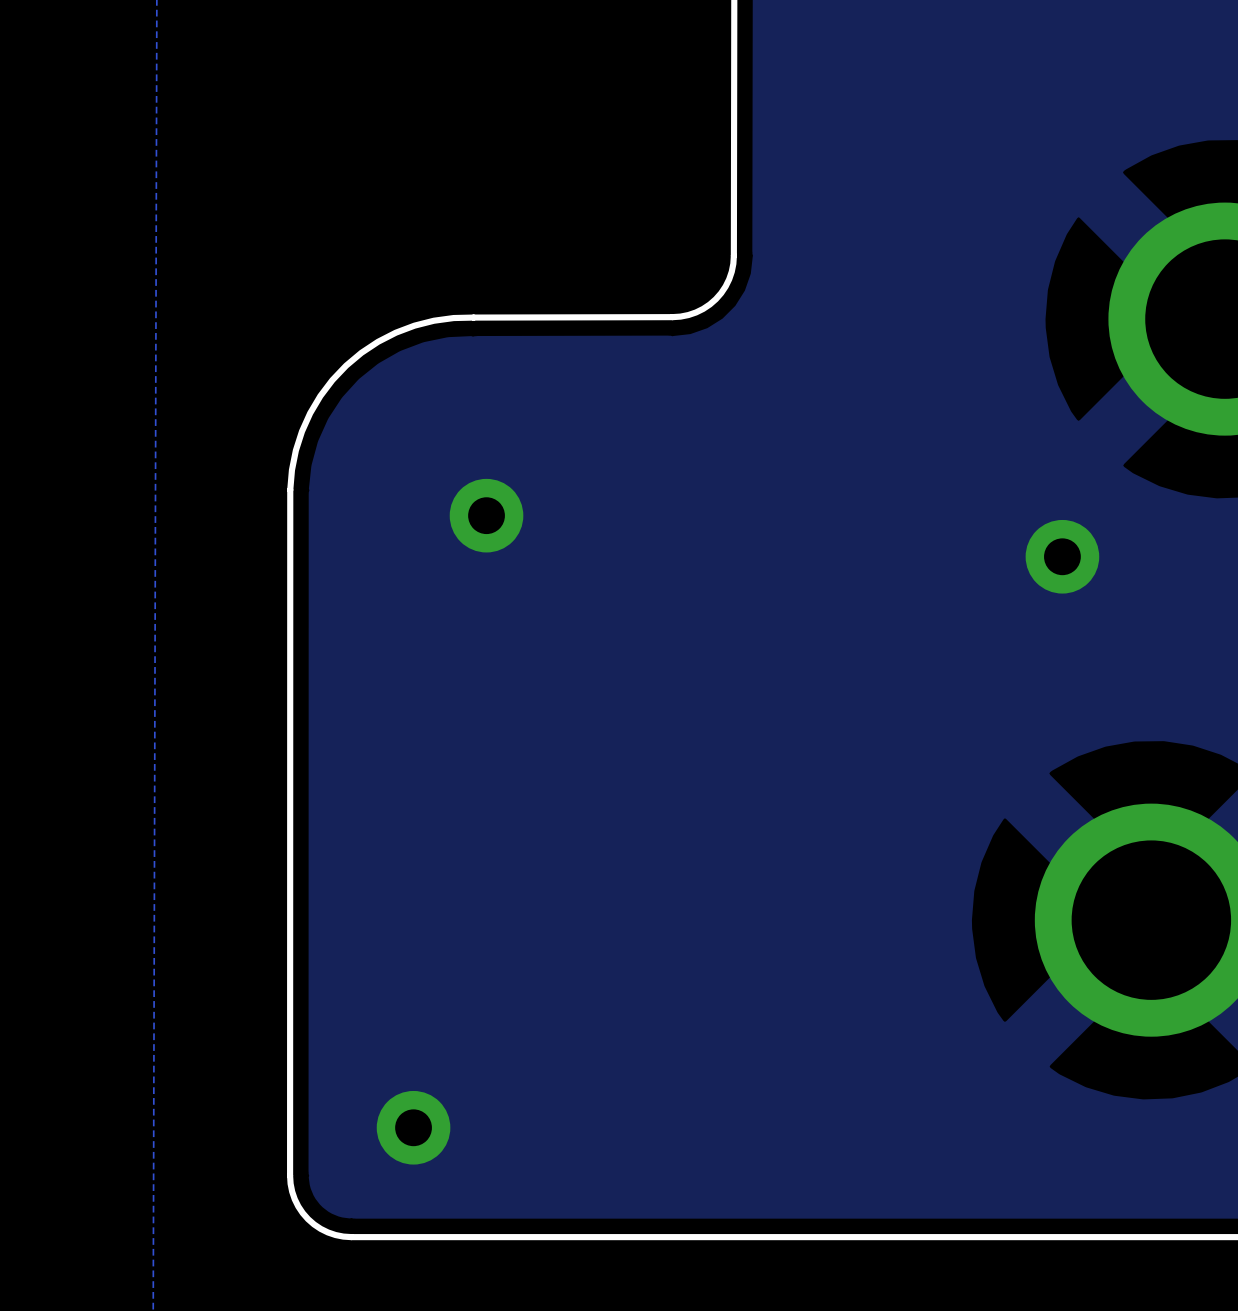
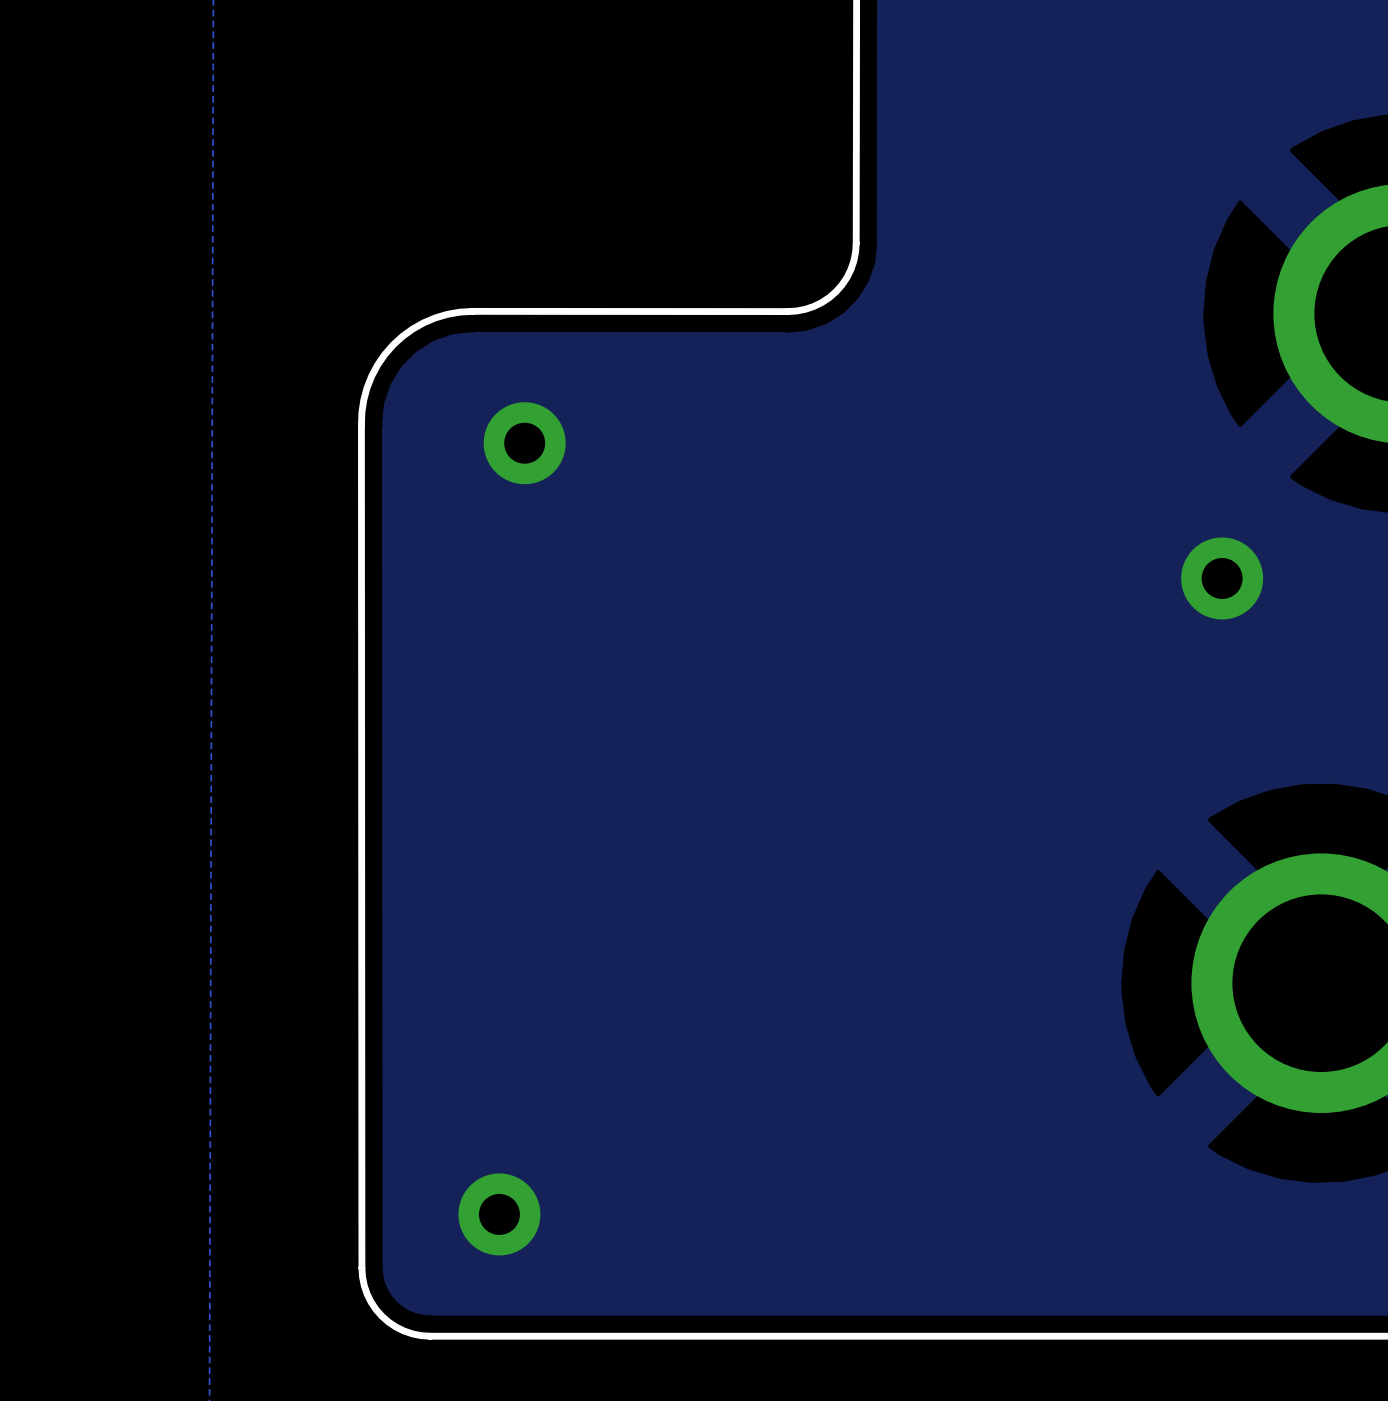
board edge: (672, 317) (453, 318) (414, 325) (378, 341) (346, 365) (320, 396) (301, 431) (291, 470) (290, 489) (290, 1175) -> (787, 311) (460, 312) (435, 317) (412, 329) (384, 354) (371, 376) (363, 400) (361, 425) (361, 1267)
via position: (486, 515) -> (524, 443)

